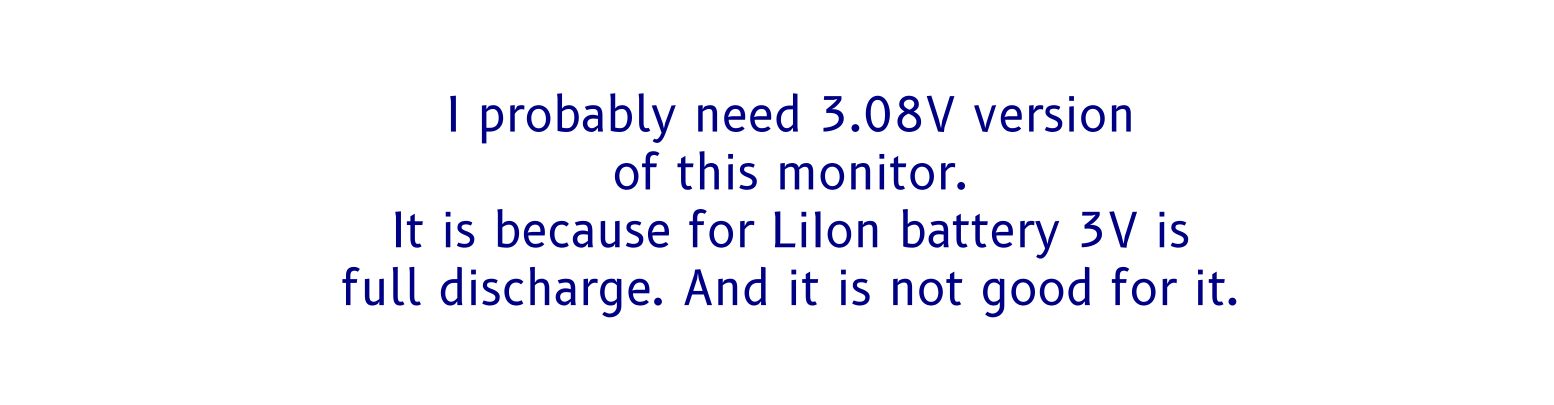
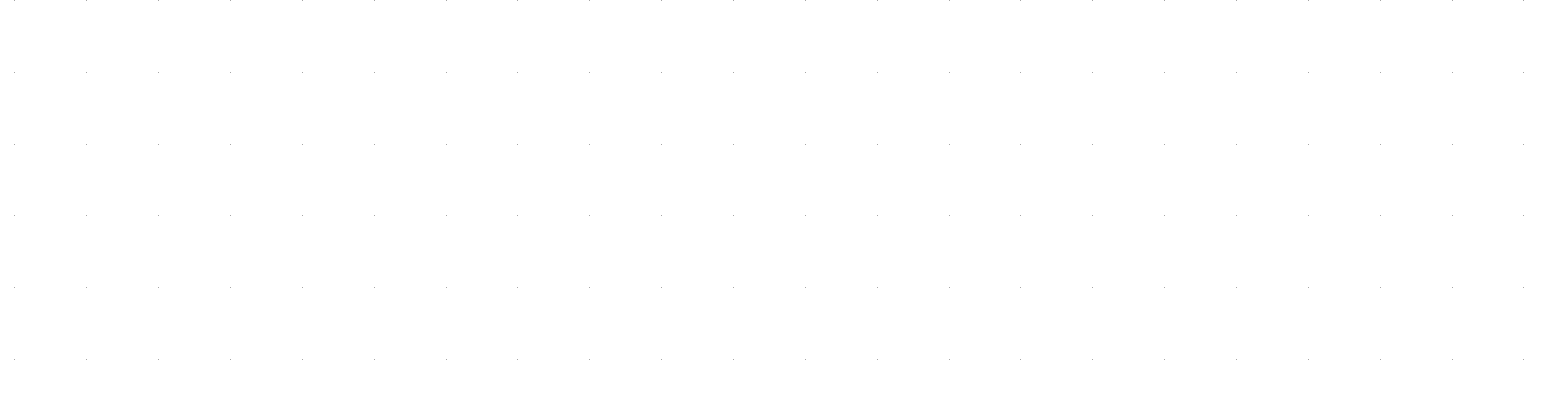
text: I probably need 3.08V version (790, 118) -> none
text: of this monitor. (789, 170) -> none
text: It is because for LiIon battery 3V is (791, 233) -> none
text: full discharge. And it is not good for it. (789, 292) -> none

